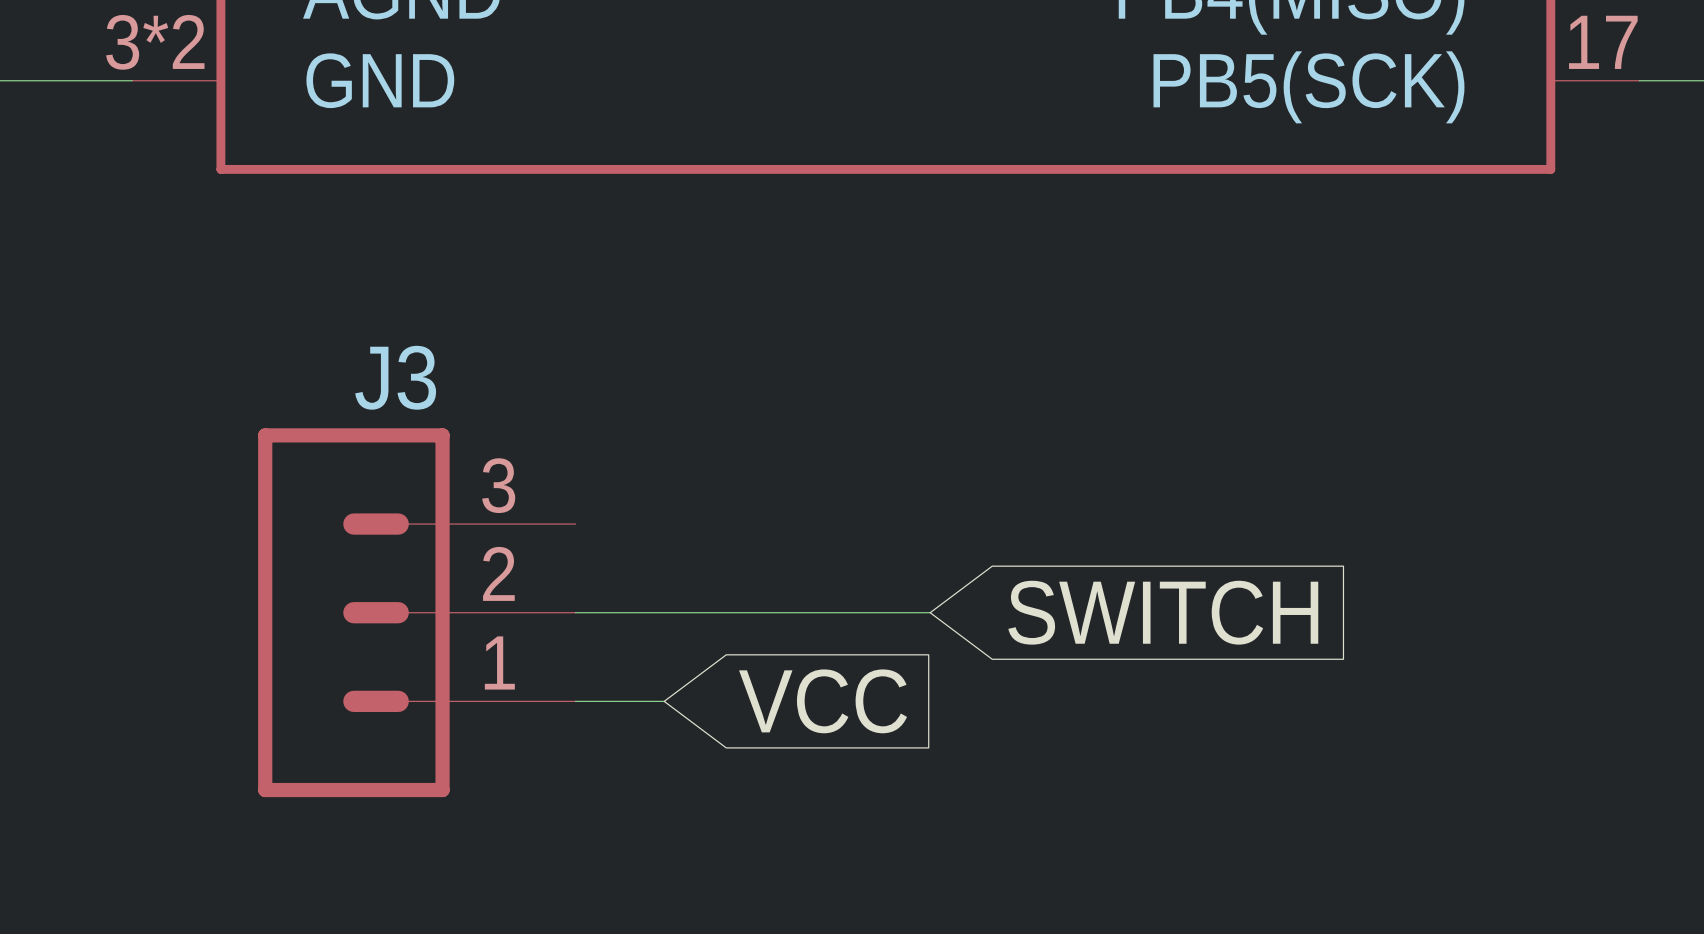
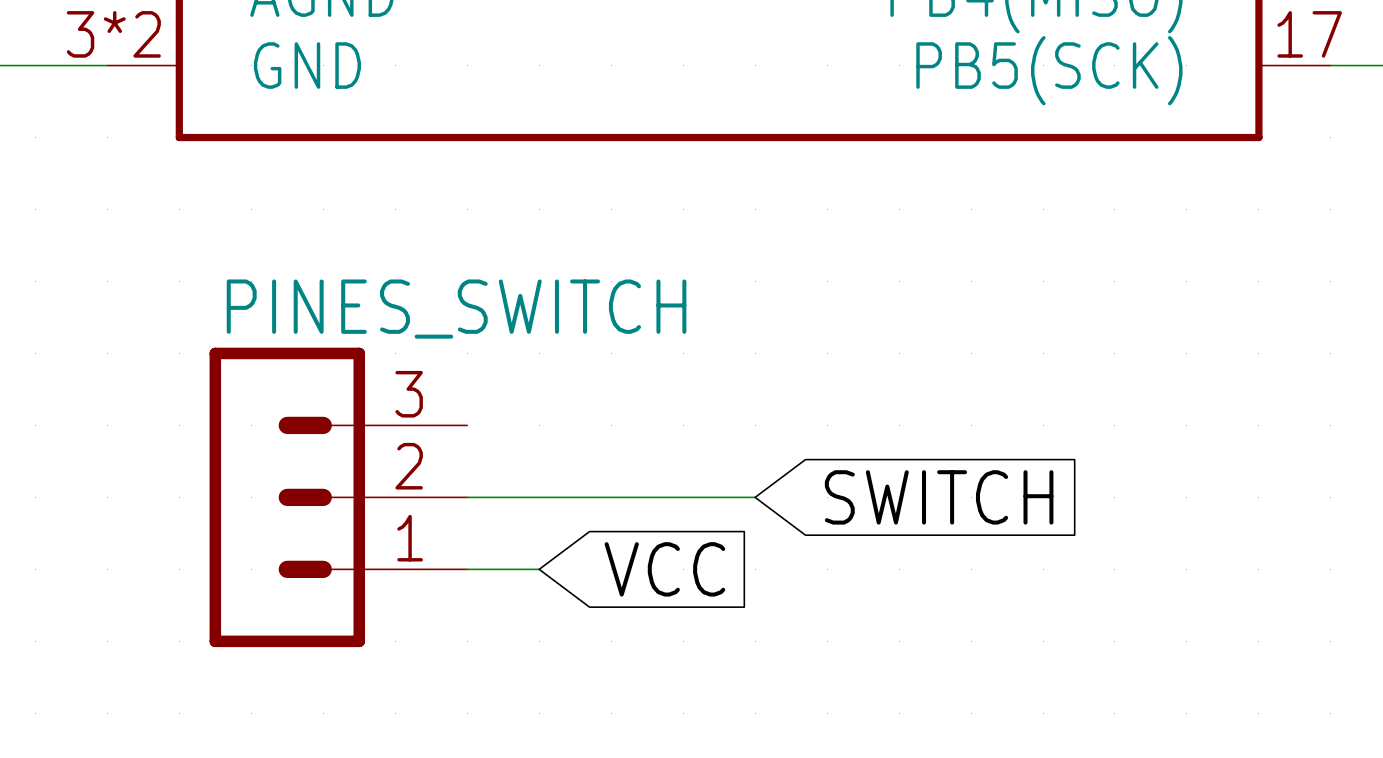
J3 name: J3 (395, 377) -> PINES_SWITCH (456, 309)

